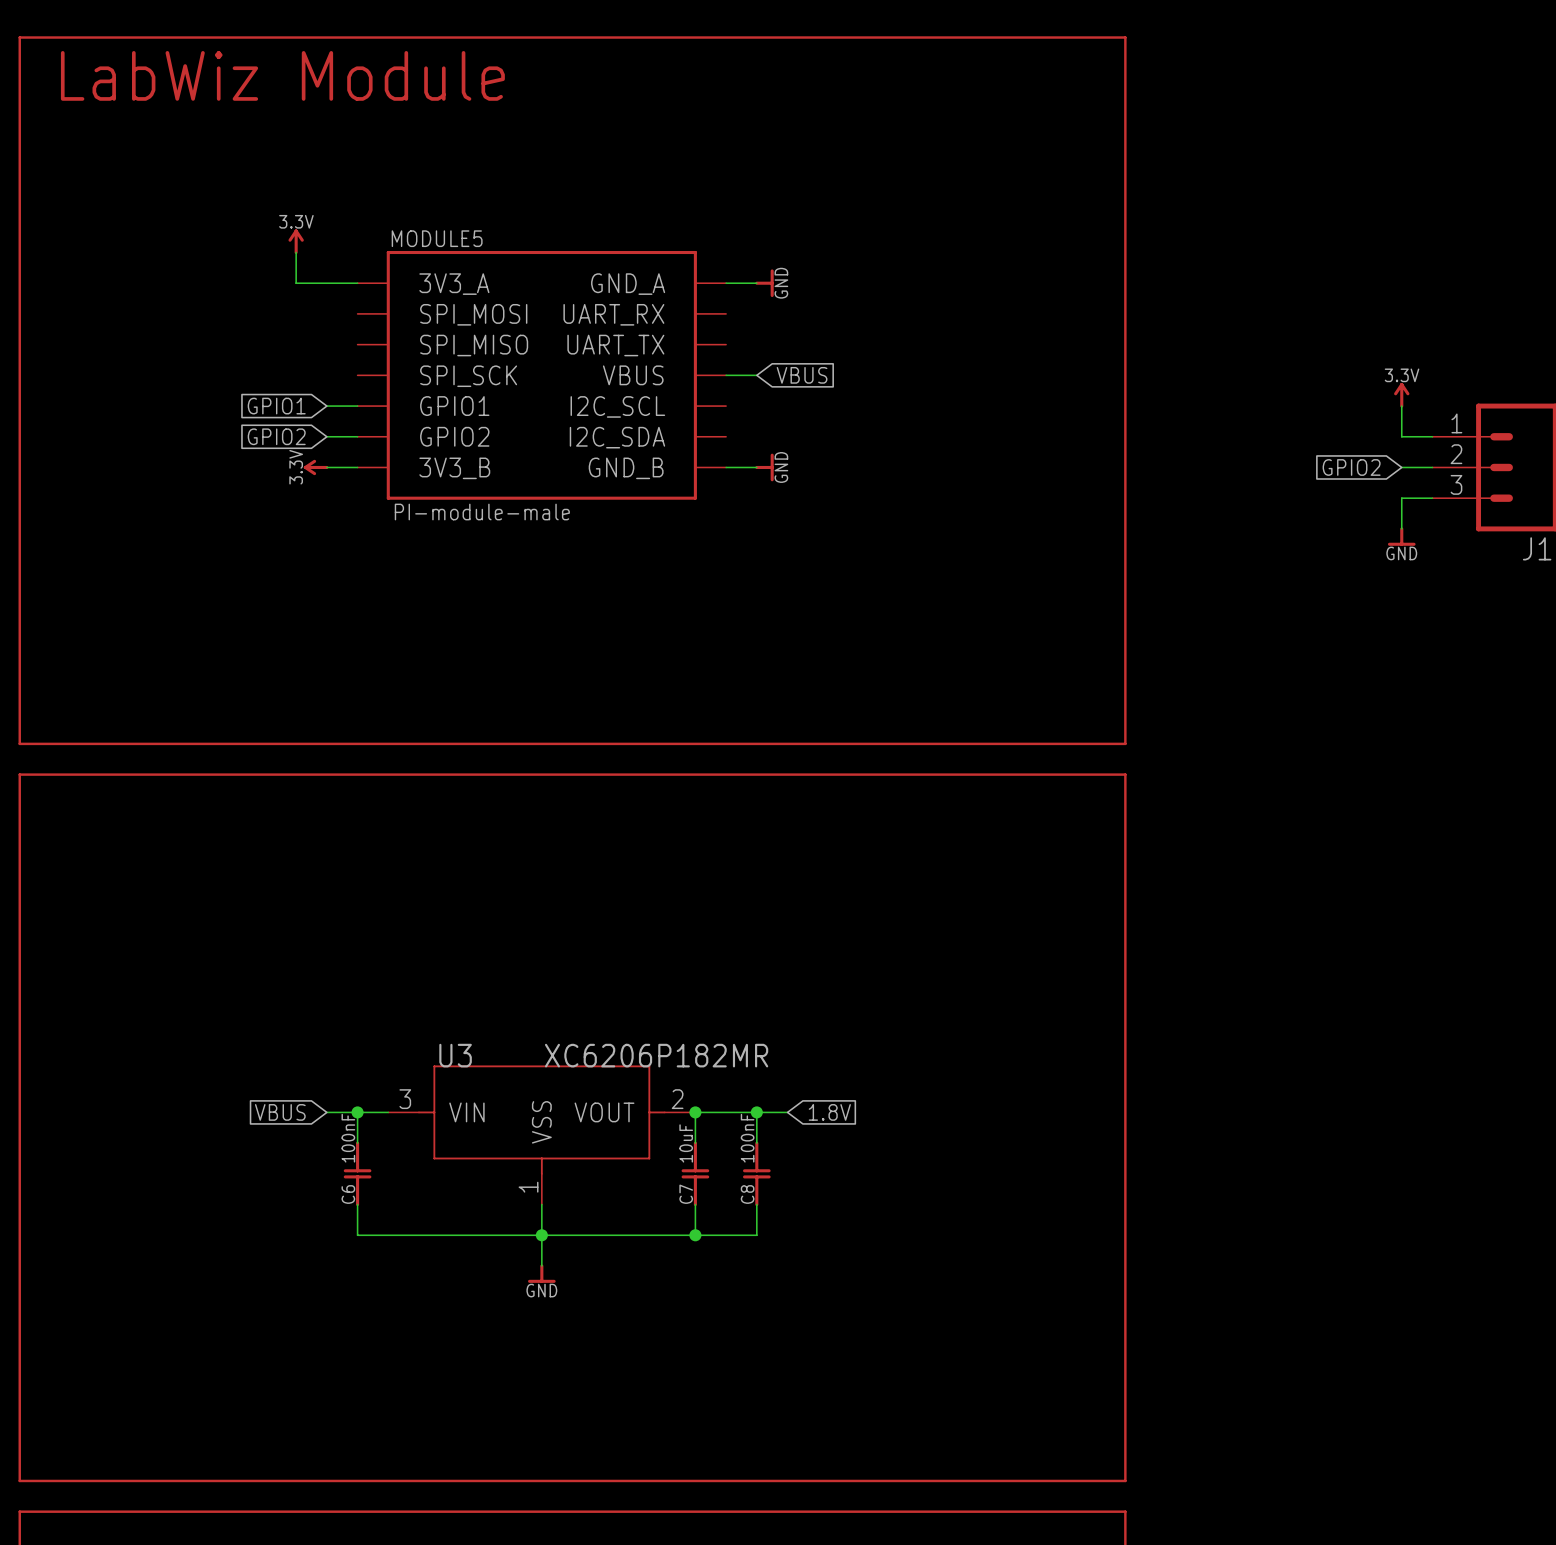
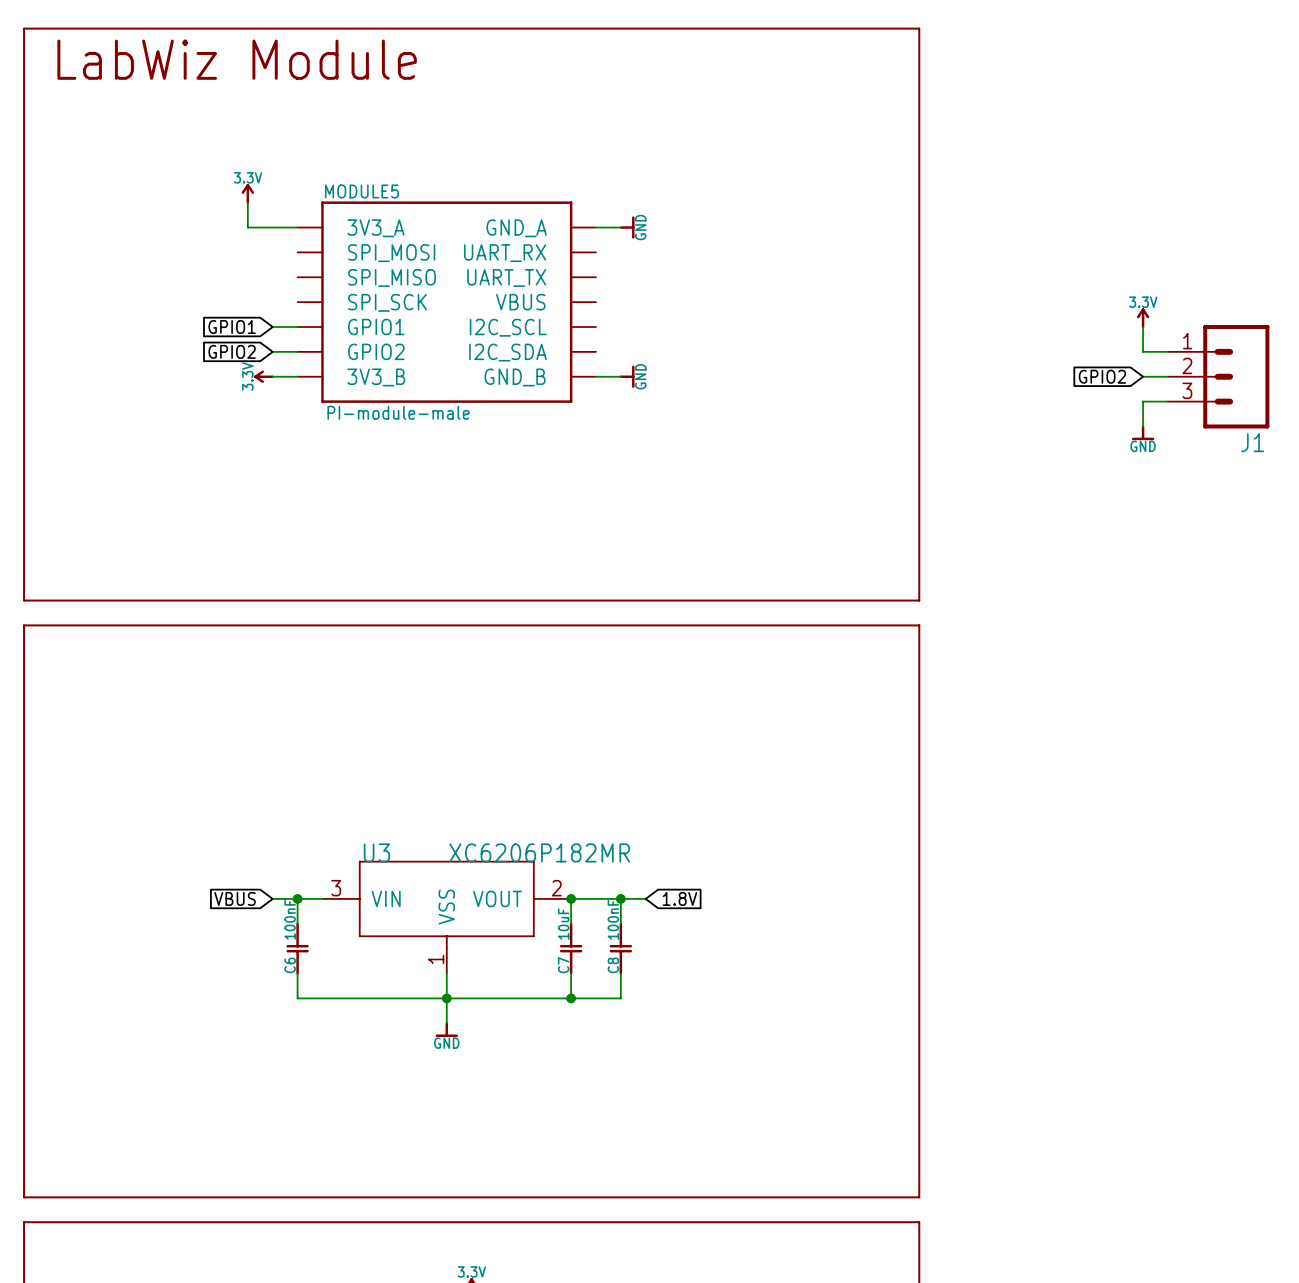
wire: (726, 375) (756, 375) -> none
global label: VBUS (802, 375) -> none

